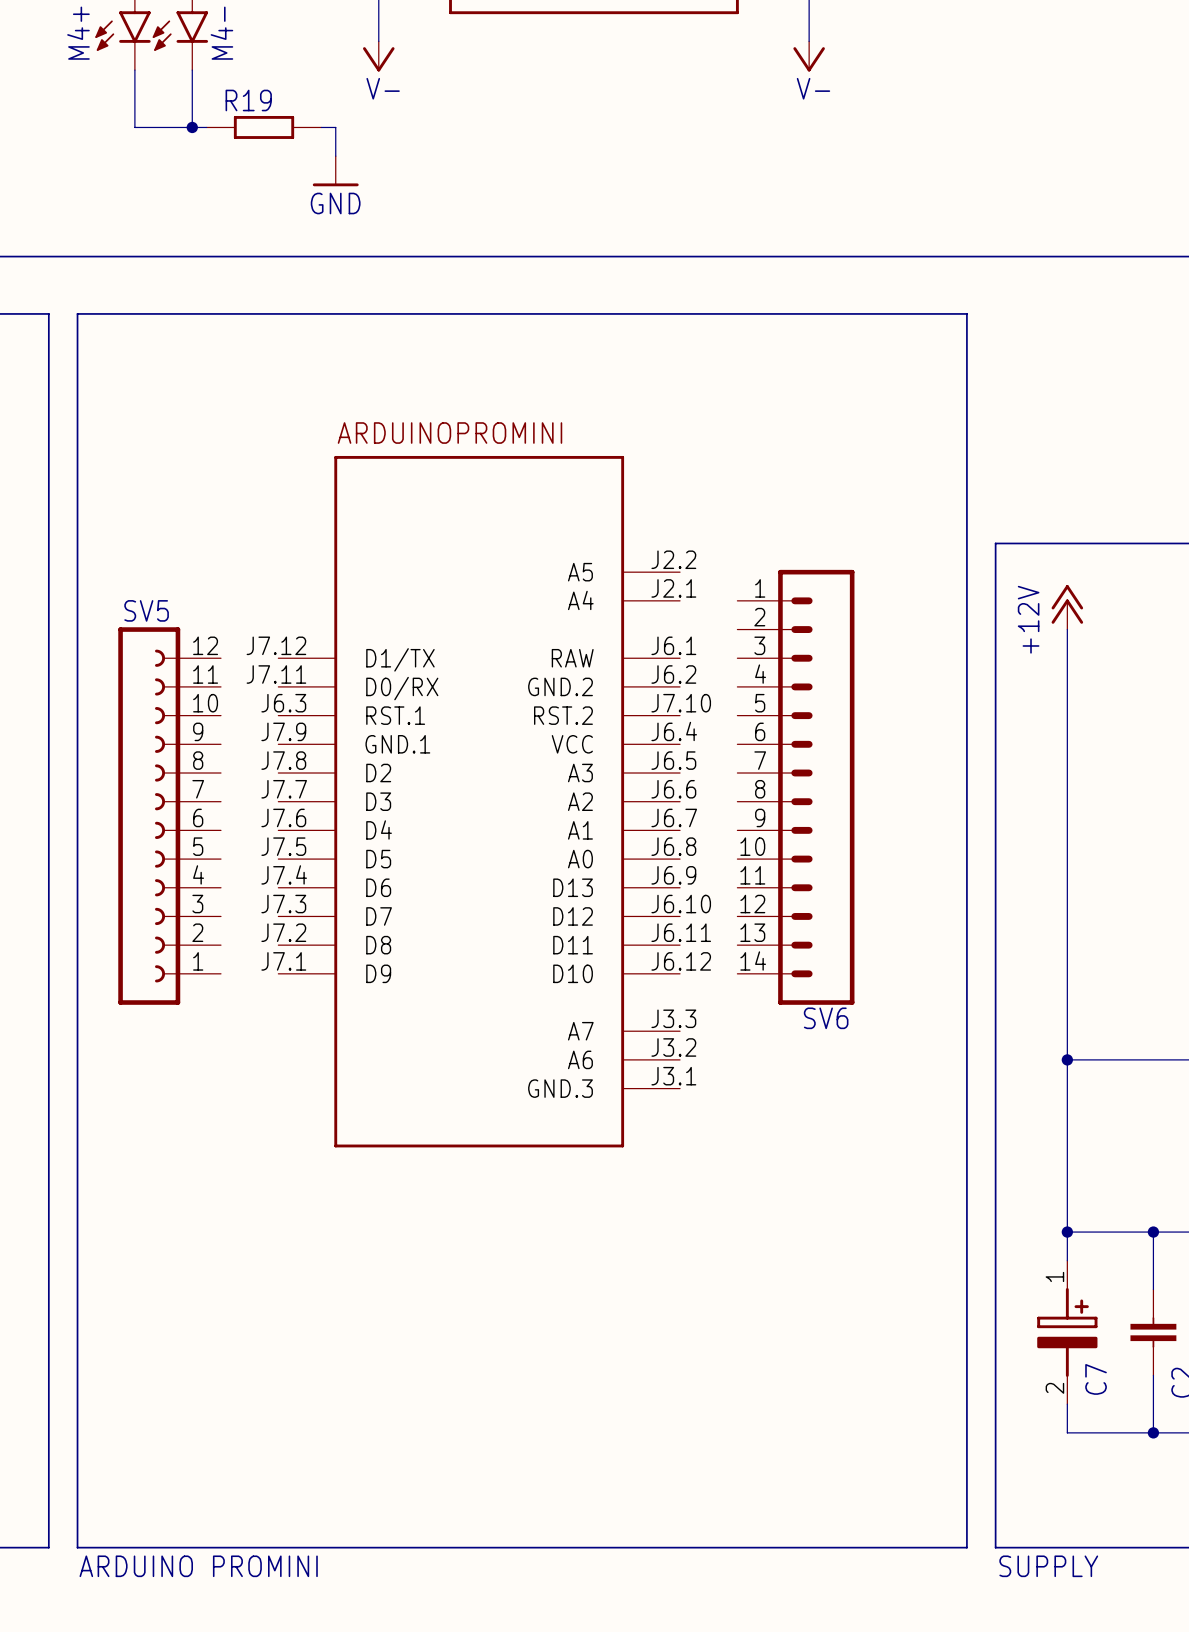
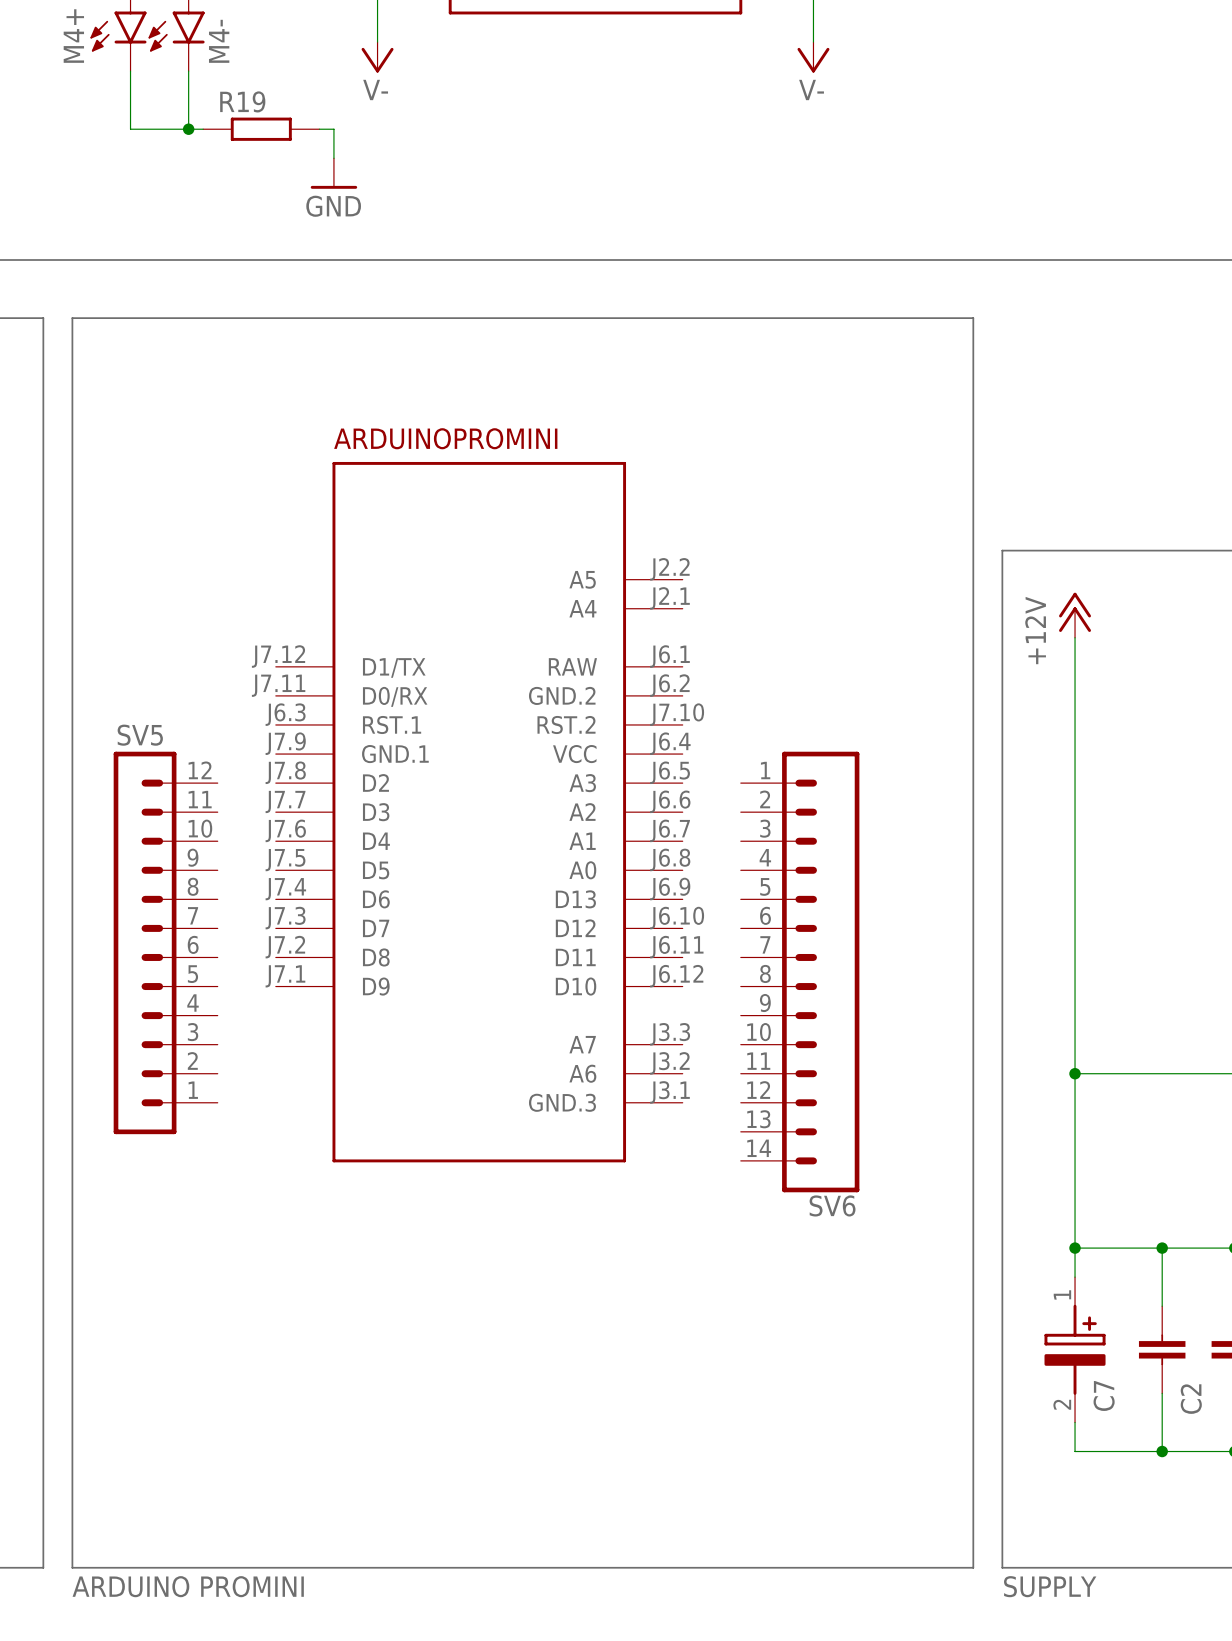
SV5 symbol: [118, 627, 221, 1005] -> [113, 751, 218, 1135]
SV6 position: (795, 787) -> (800, 972)

